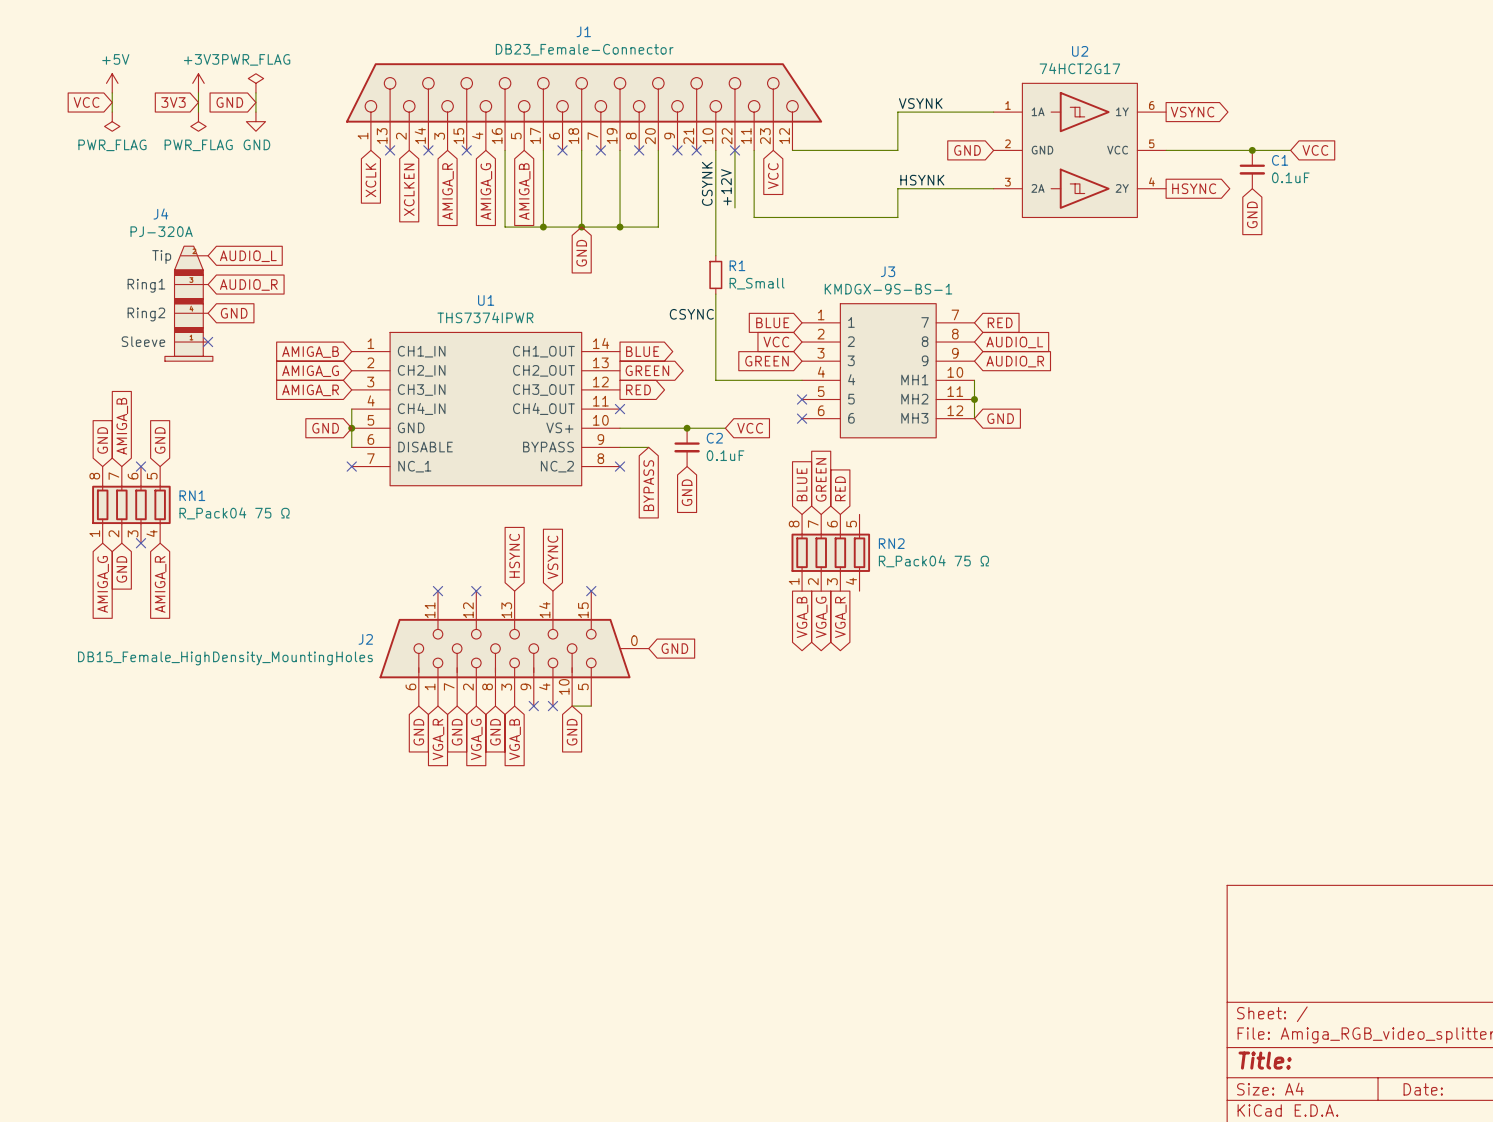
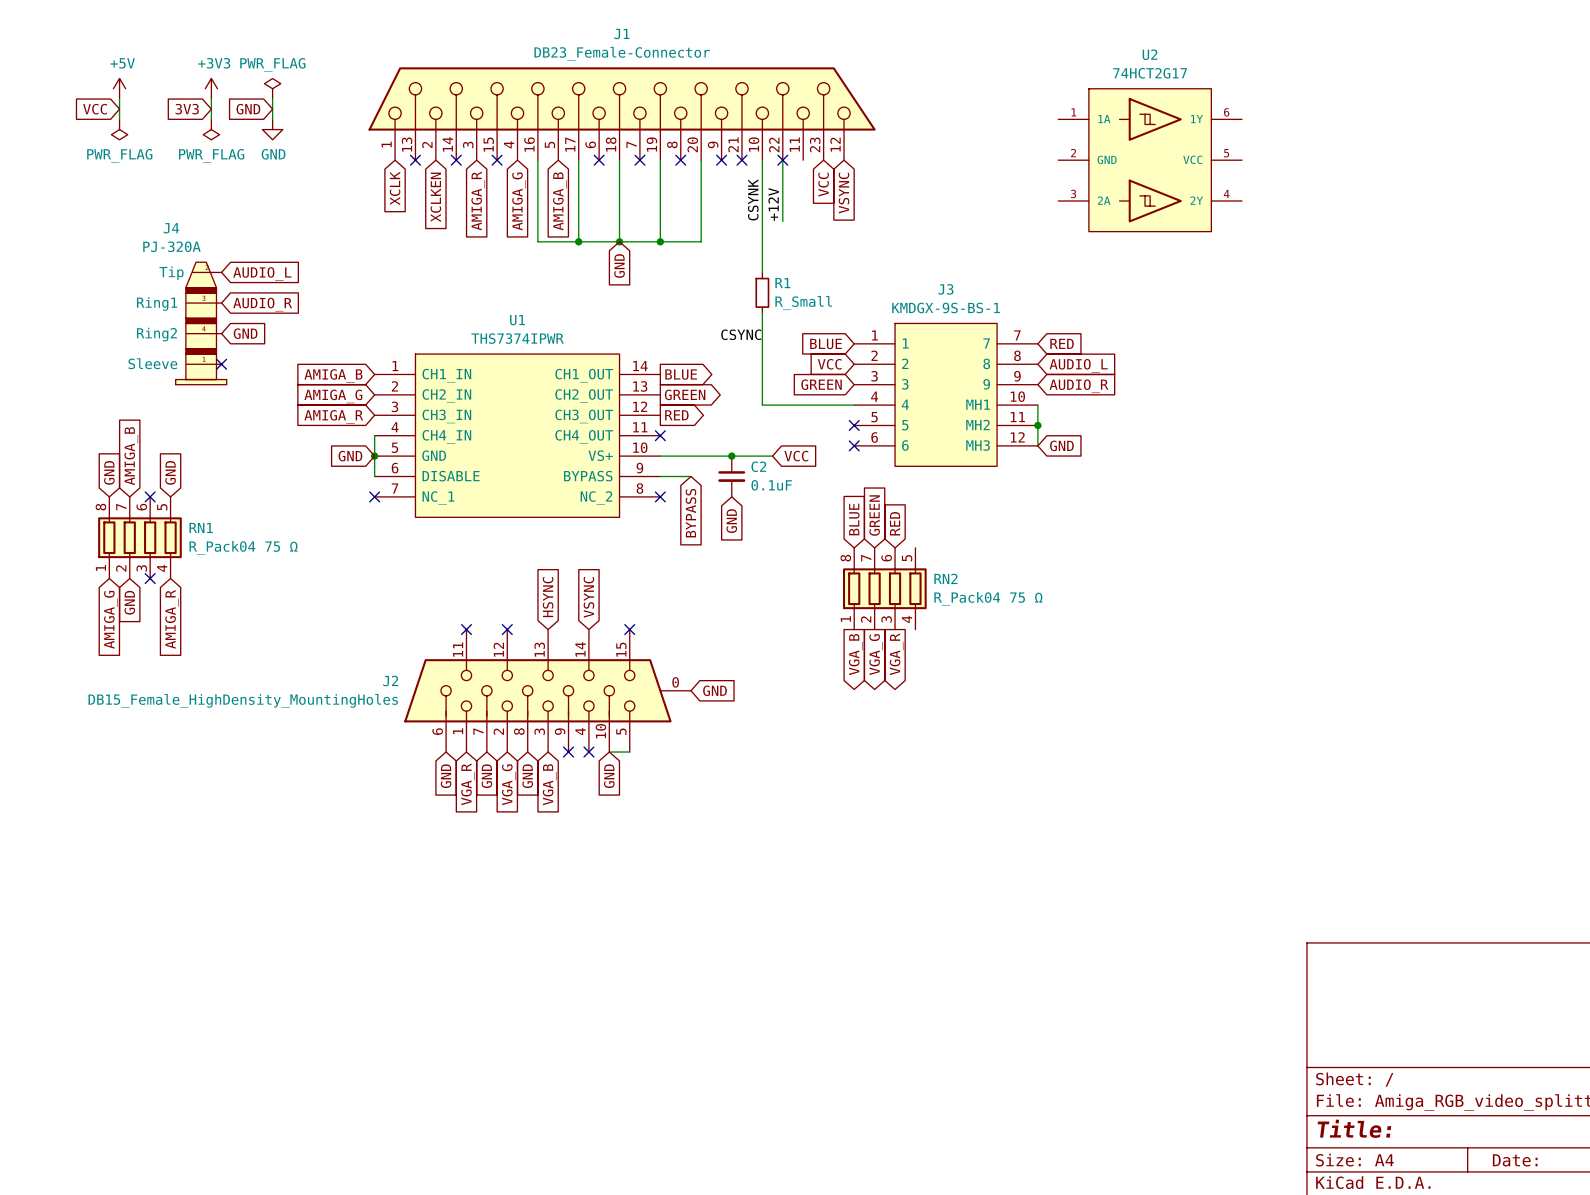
label: VSYNK (920, 103) -> none
wire: (993, 112) (897, 112) (897, 150) (792, 150) -> none
global label: VSYNC (1192, 112) -> none
wire: (754, 150) (754, 217) (897, 217) (897, 188) (993, 188) -> none
global label: GND (967, 150) -> none
wire: (1166, 150) (1290, 150) -> none
junction: (1252, 150) -> none
global label: VCC (1315, 150) -> none
C1: 0.1uF (1252, 169) -> none
label: HSYNK (922, 180) -> none
global label: none -> VSYNC (844, 193)
global label: HSYNC (1194, 188) -> none
global label: GND (1252, 214) -> none

